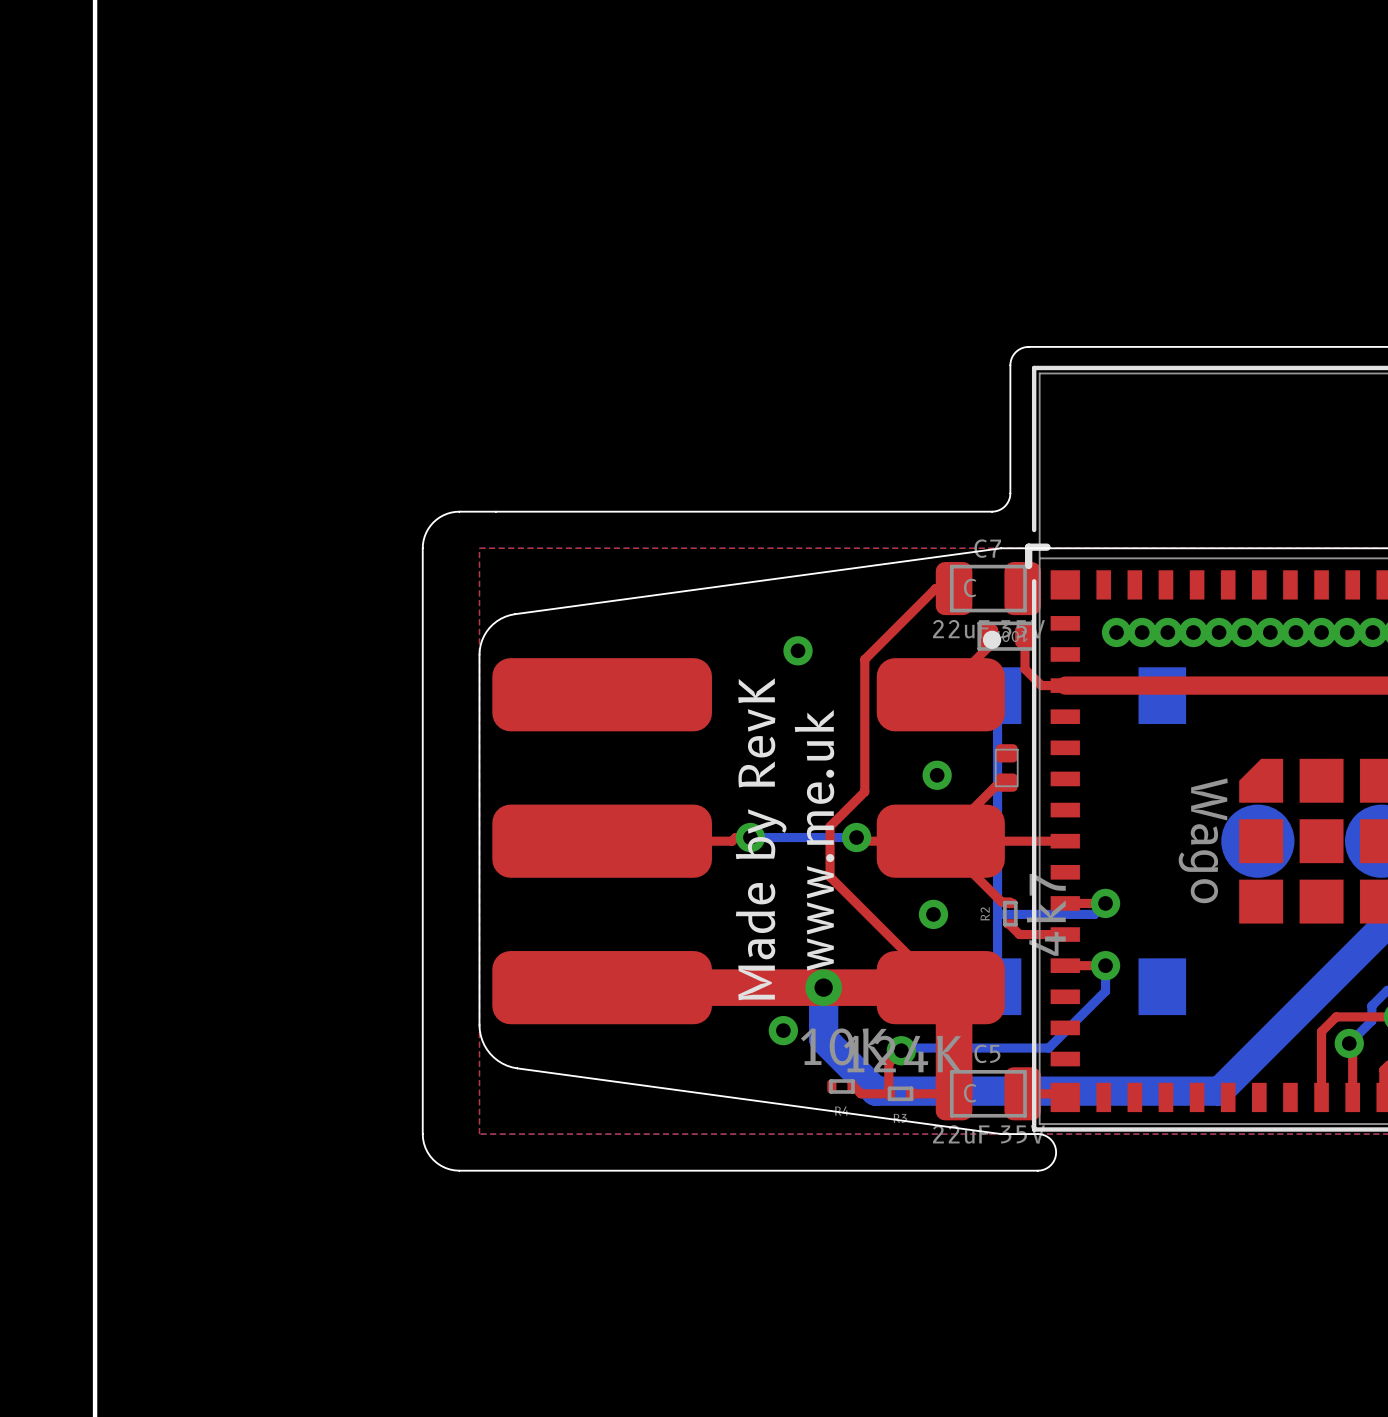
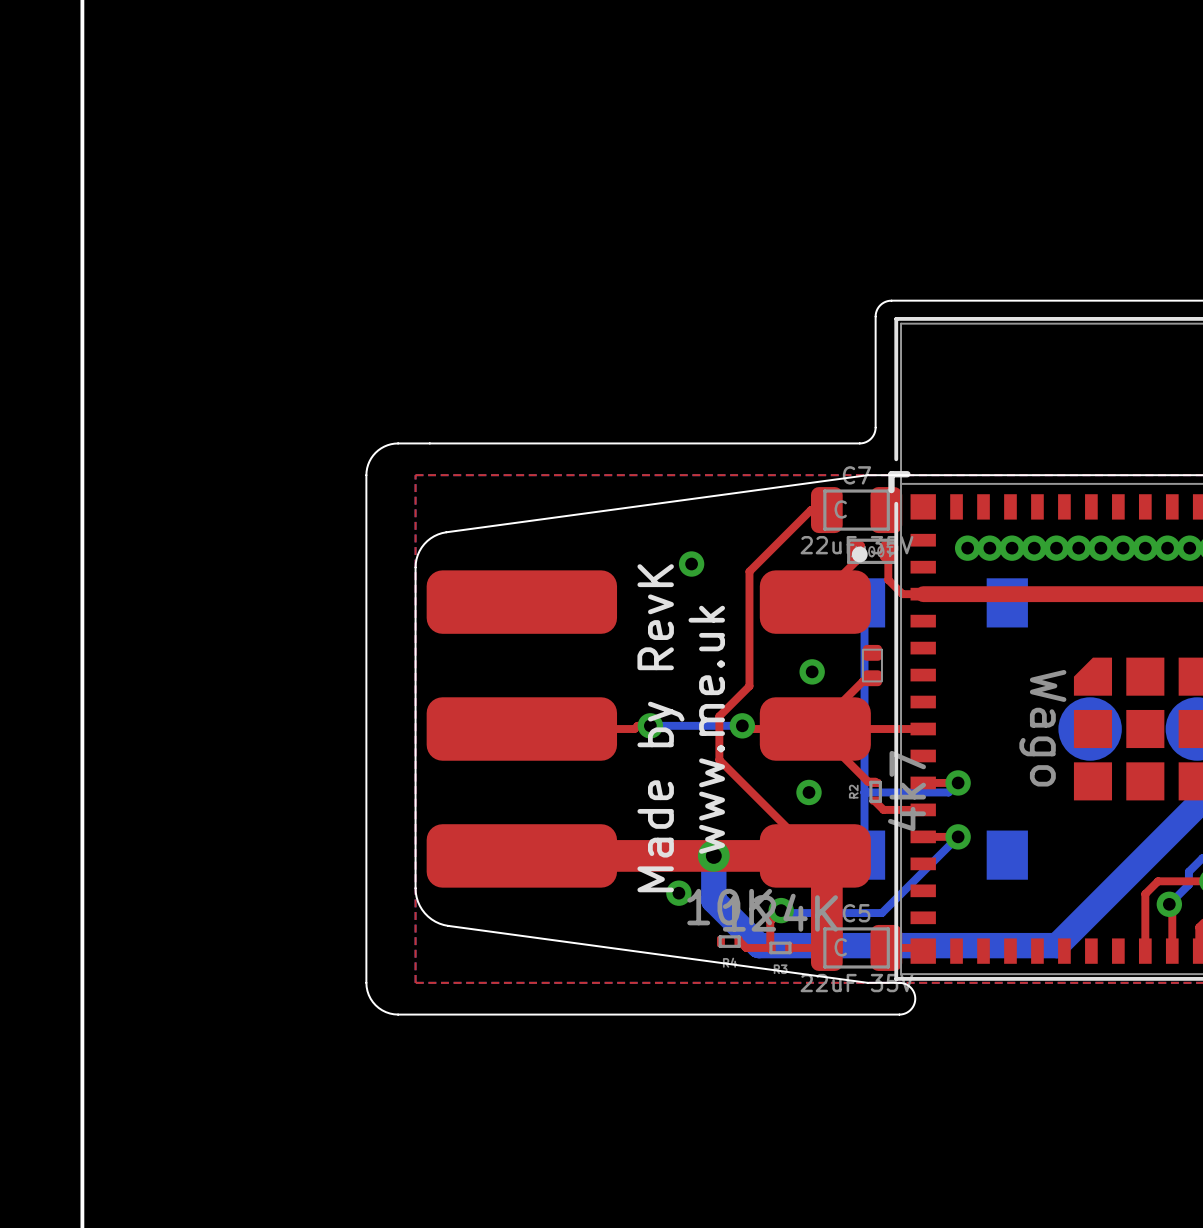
bottom track: (1105, 965) (1105, 991) (1048, 1048) (904, 1048) (901, 1050) -> (958, 836) (881, 913) (783, 913) (781, 910)

